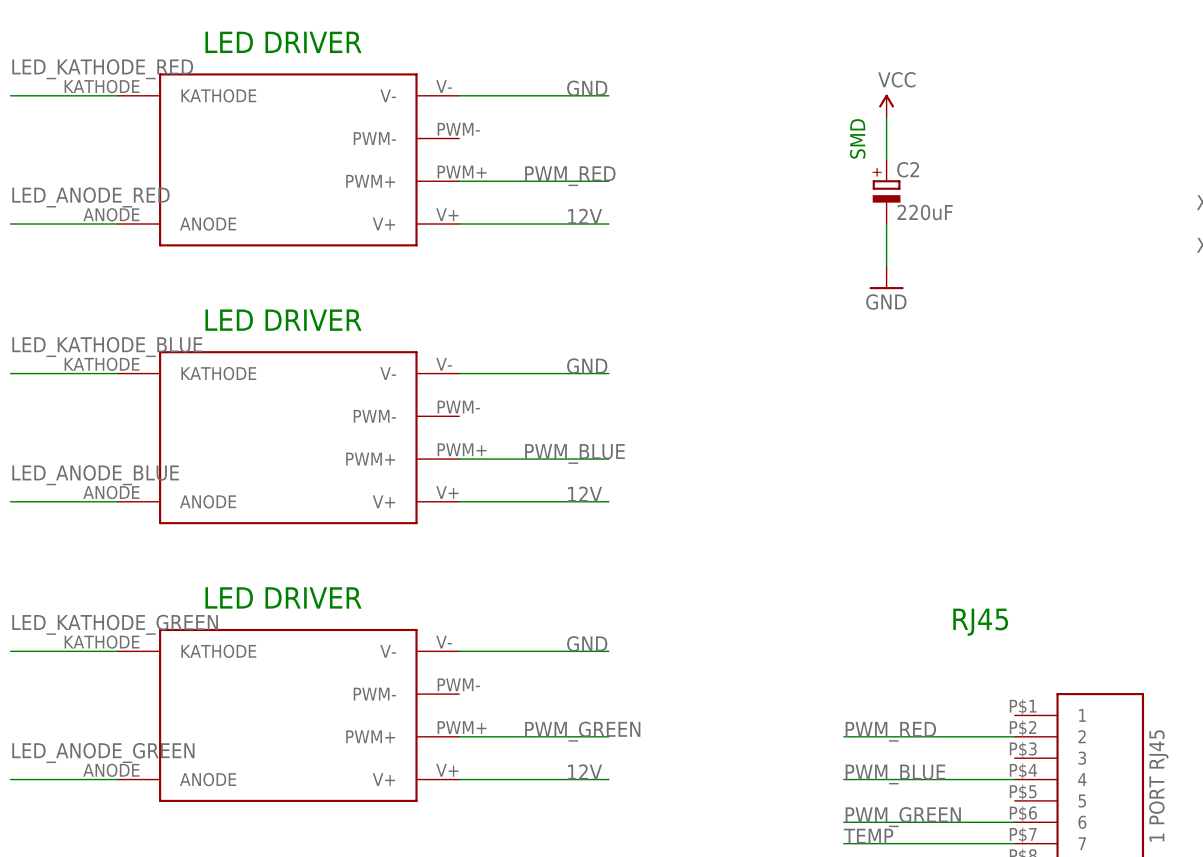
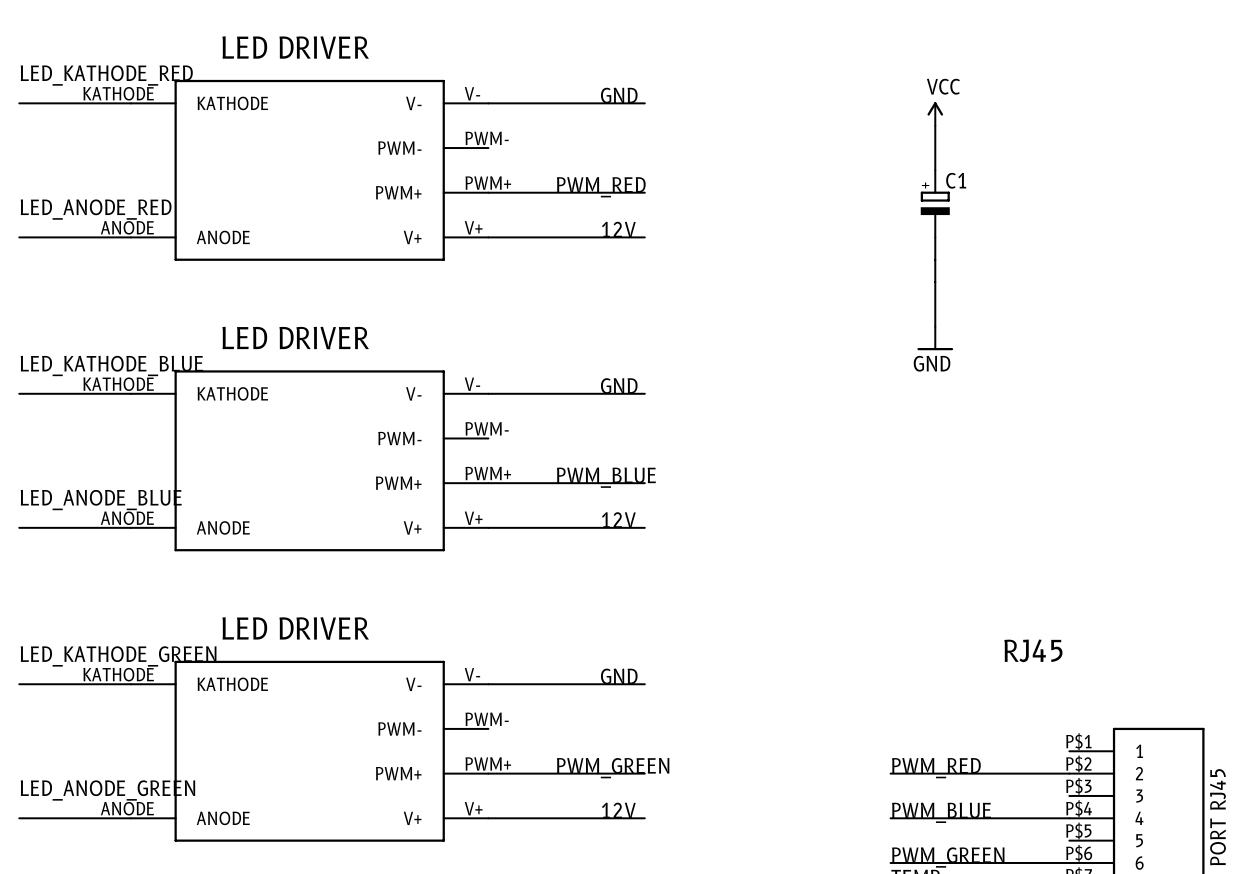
text: SMD (857, 138) -> none
C2 name: C2 (908, 169) -> C1 (956, 180)
C2 value: 220uF (925, 212) -> none
power symbol position: GND (886, 277) -> GND (935, 338)

